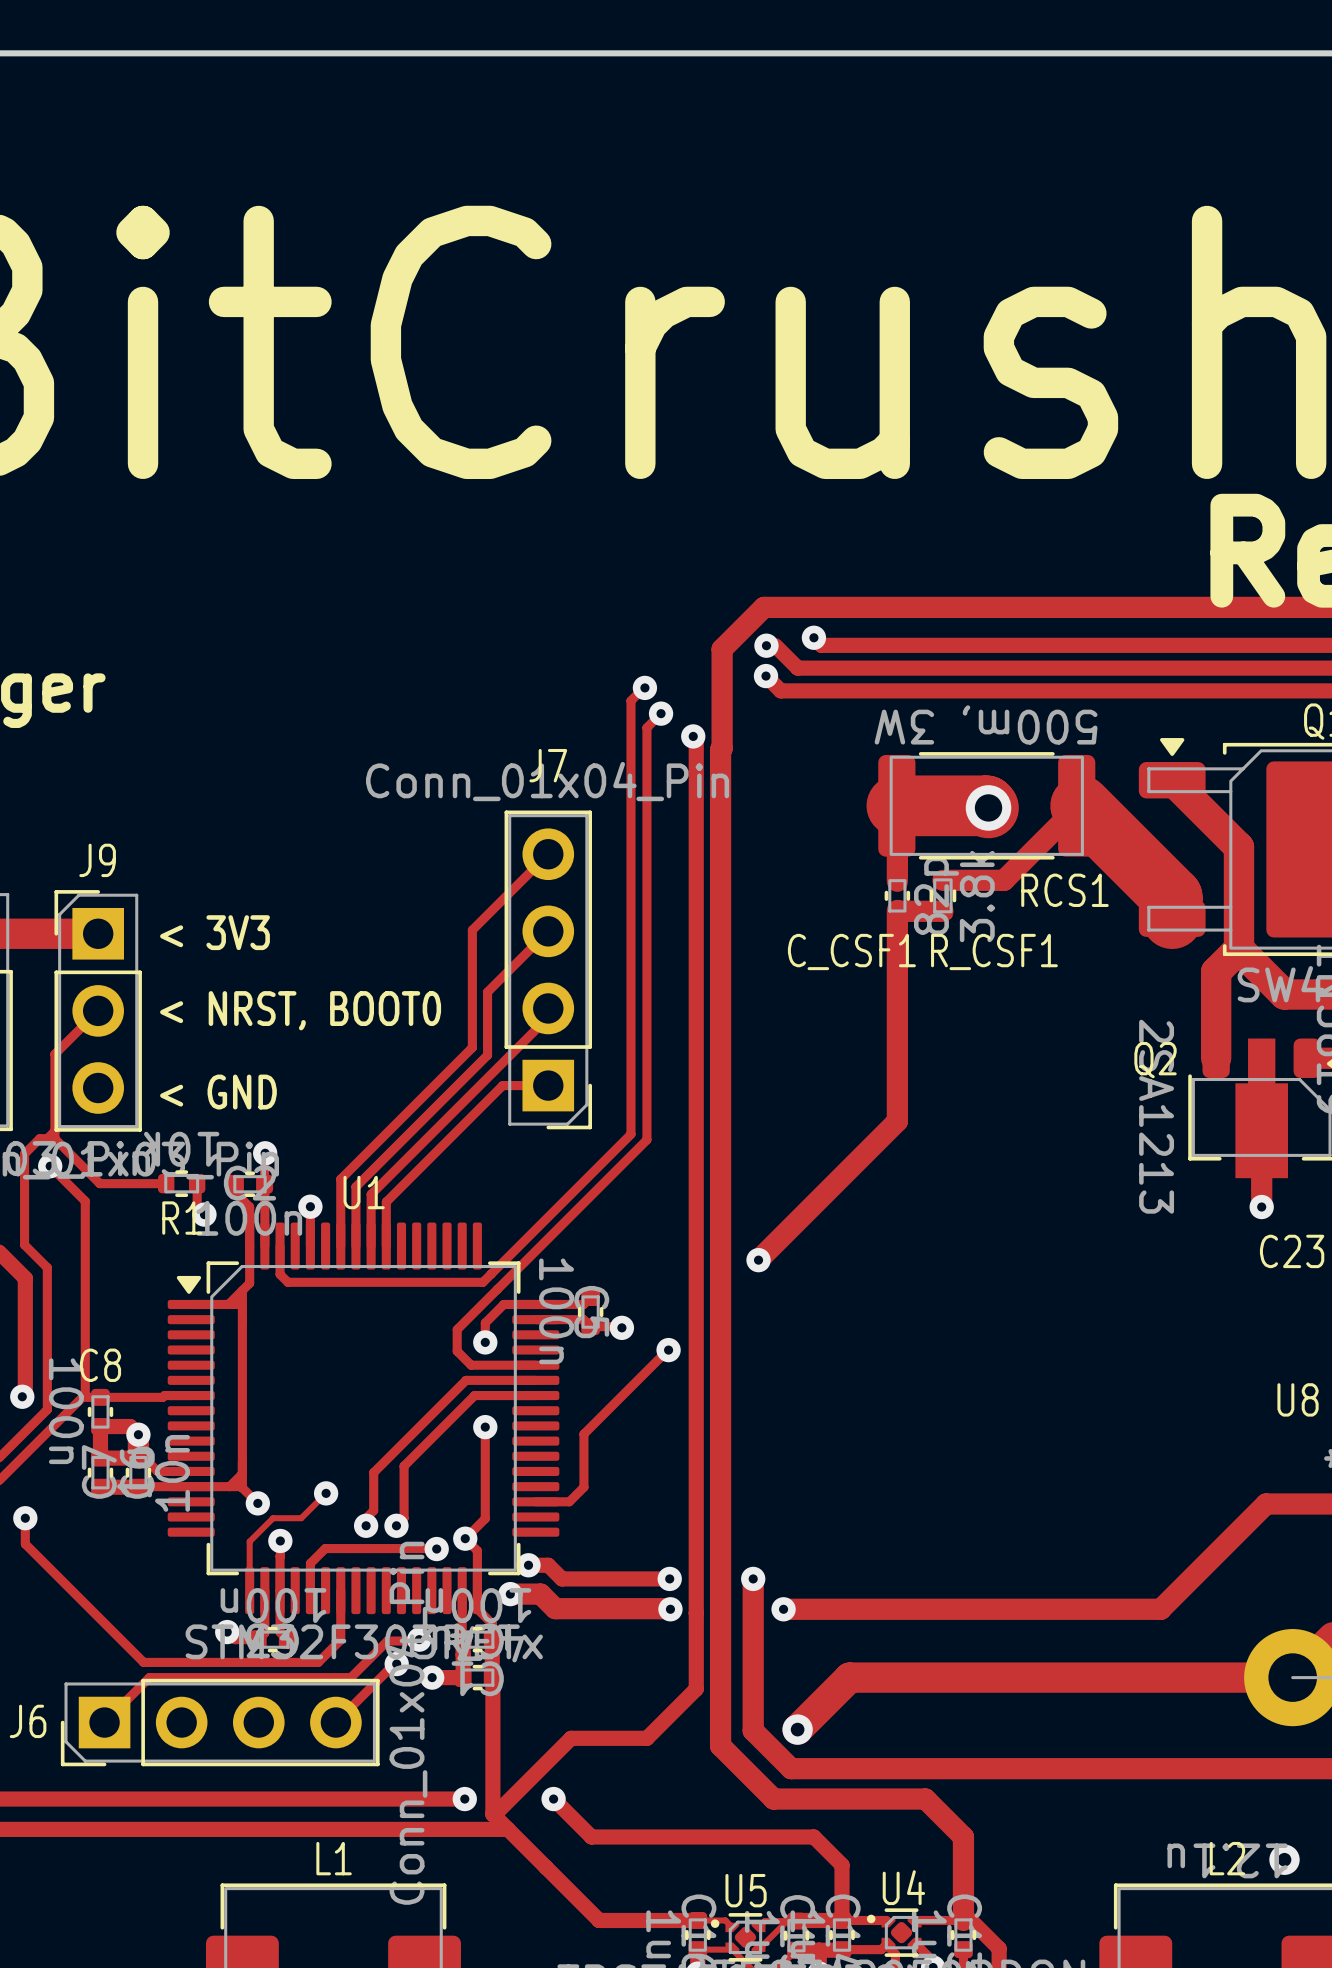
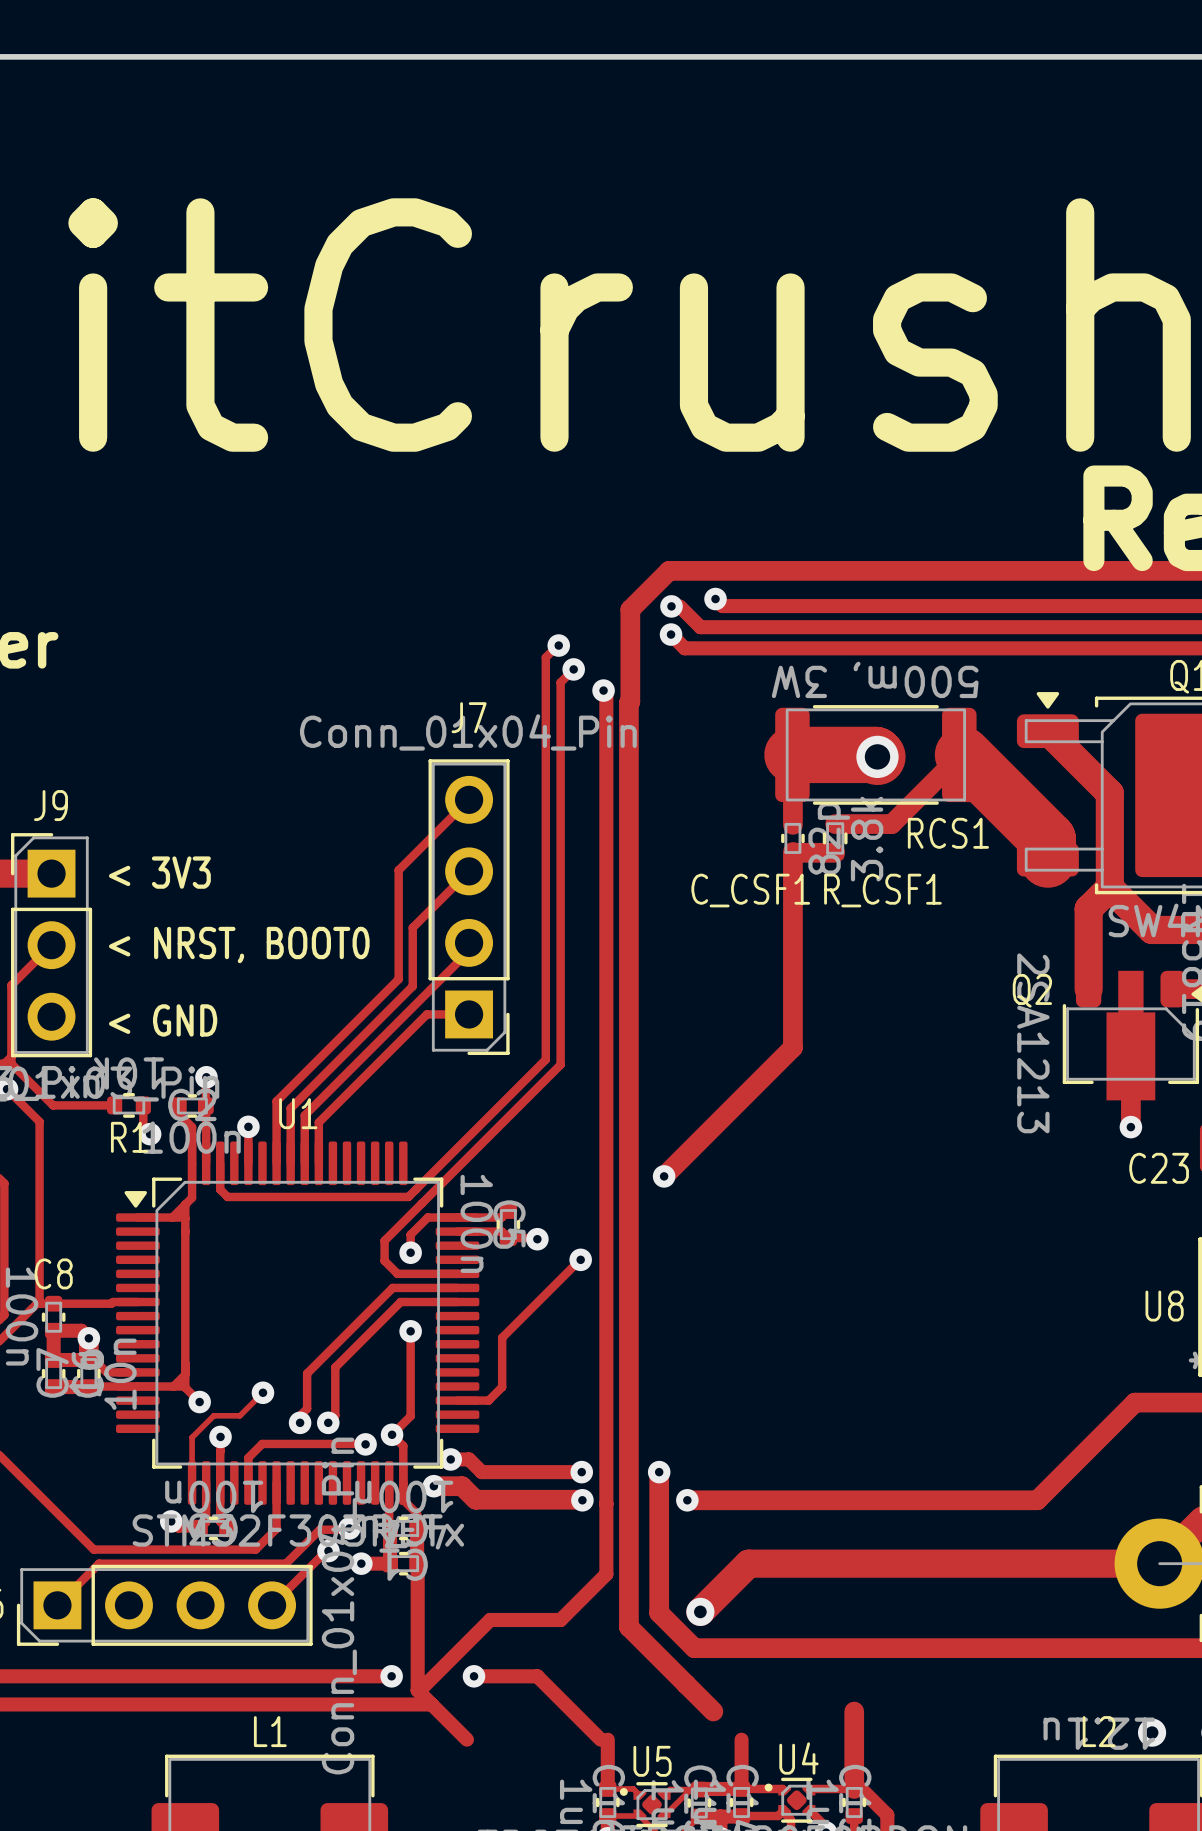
track: (553, 1799) (591, 1836) (813, 1836) (842, 1865) (842, 1867) -> (474, 1676) (537, 1676) (600, 1739)
track: (773, 1799) (925, 1799) (963, 1836) -> (678, 1676) (713, 1711)
track: (546, 1867) (599, 1920) (697, 1920) -> (607, 1739) (607, 1788)

